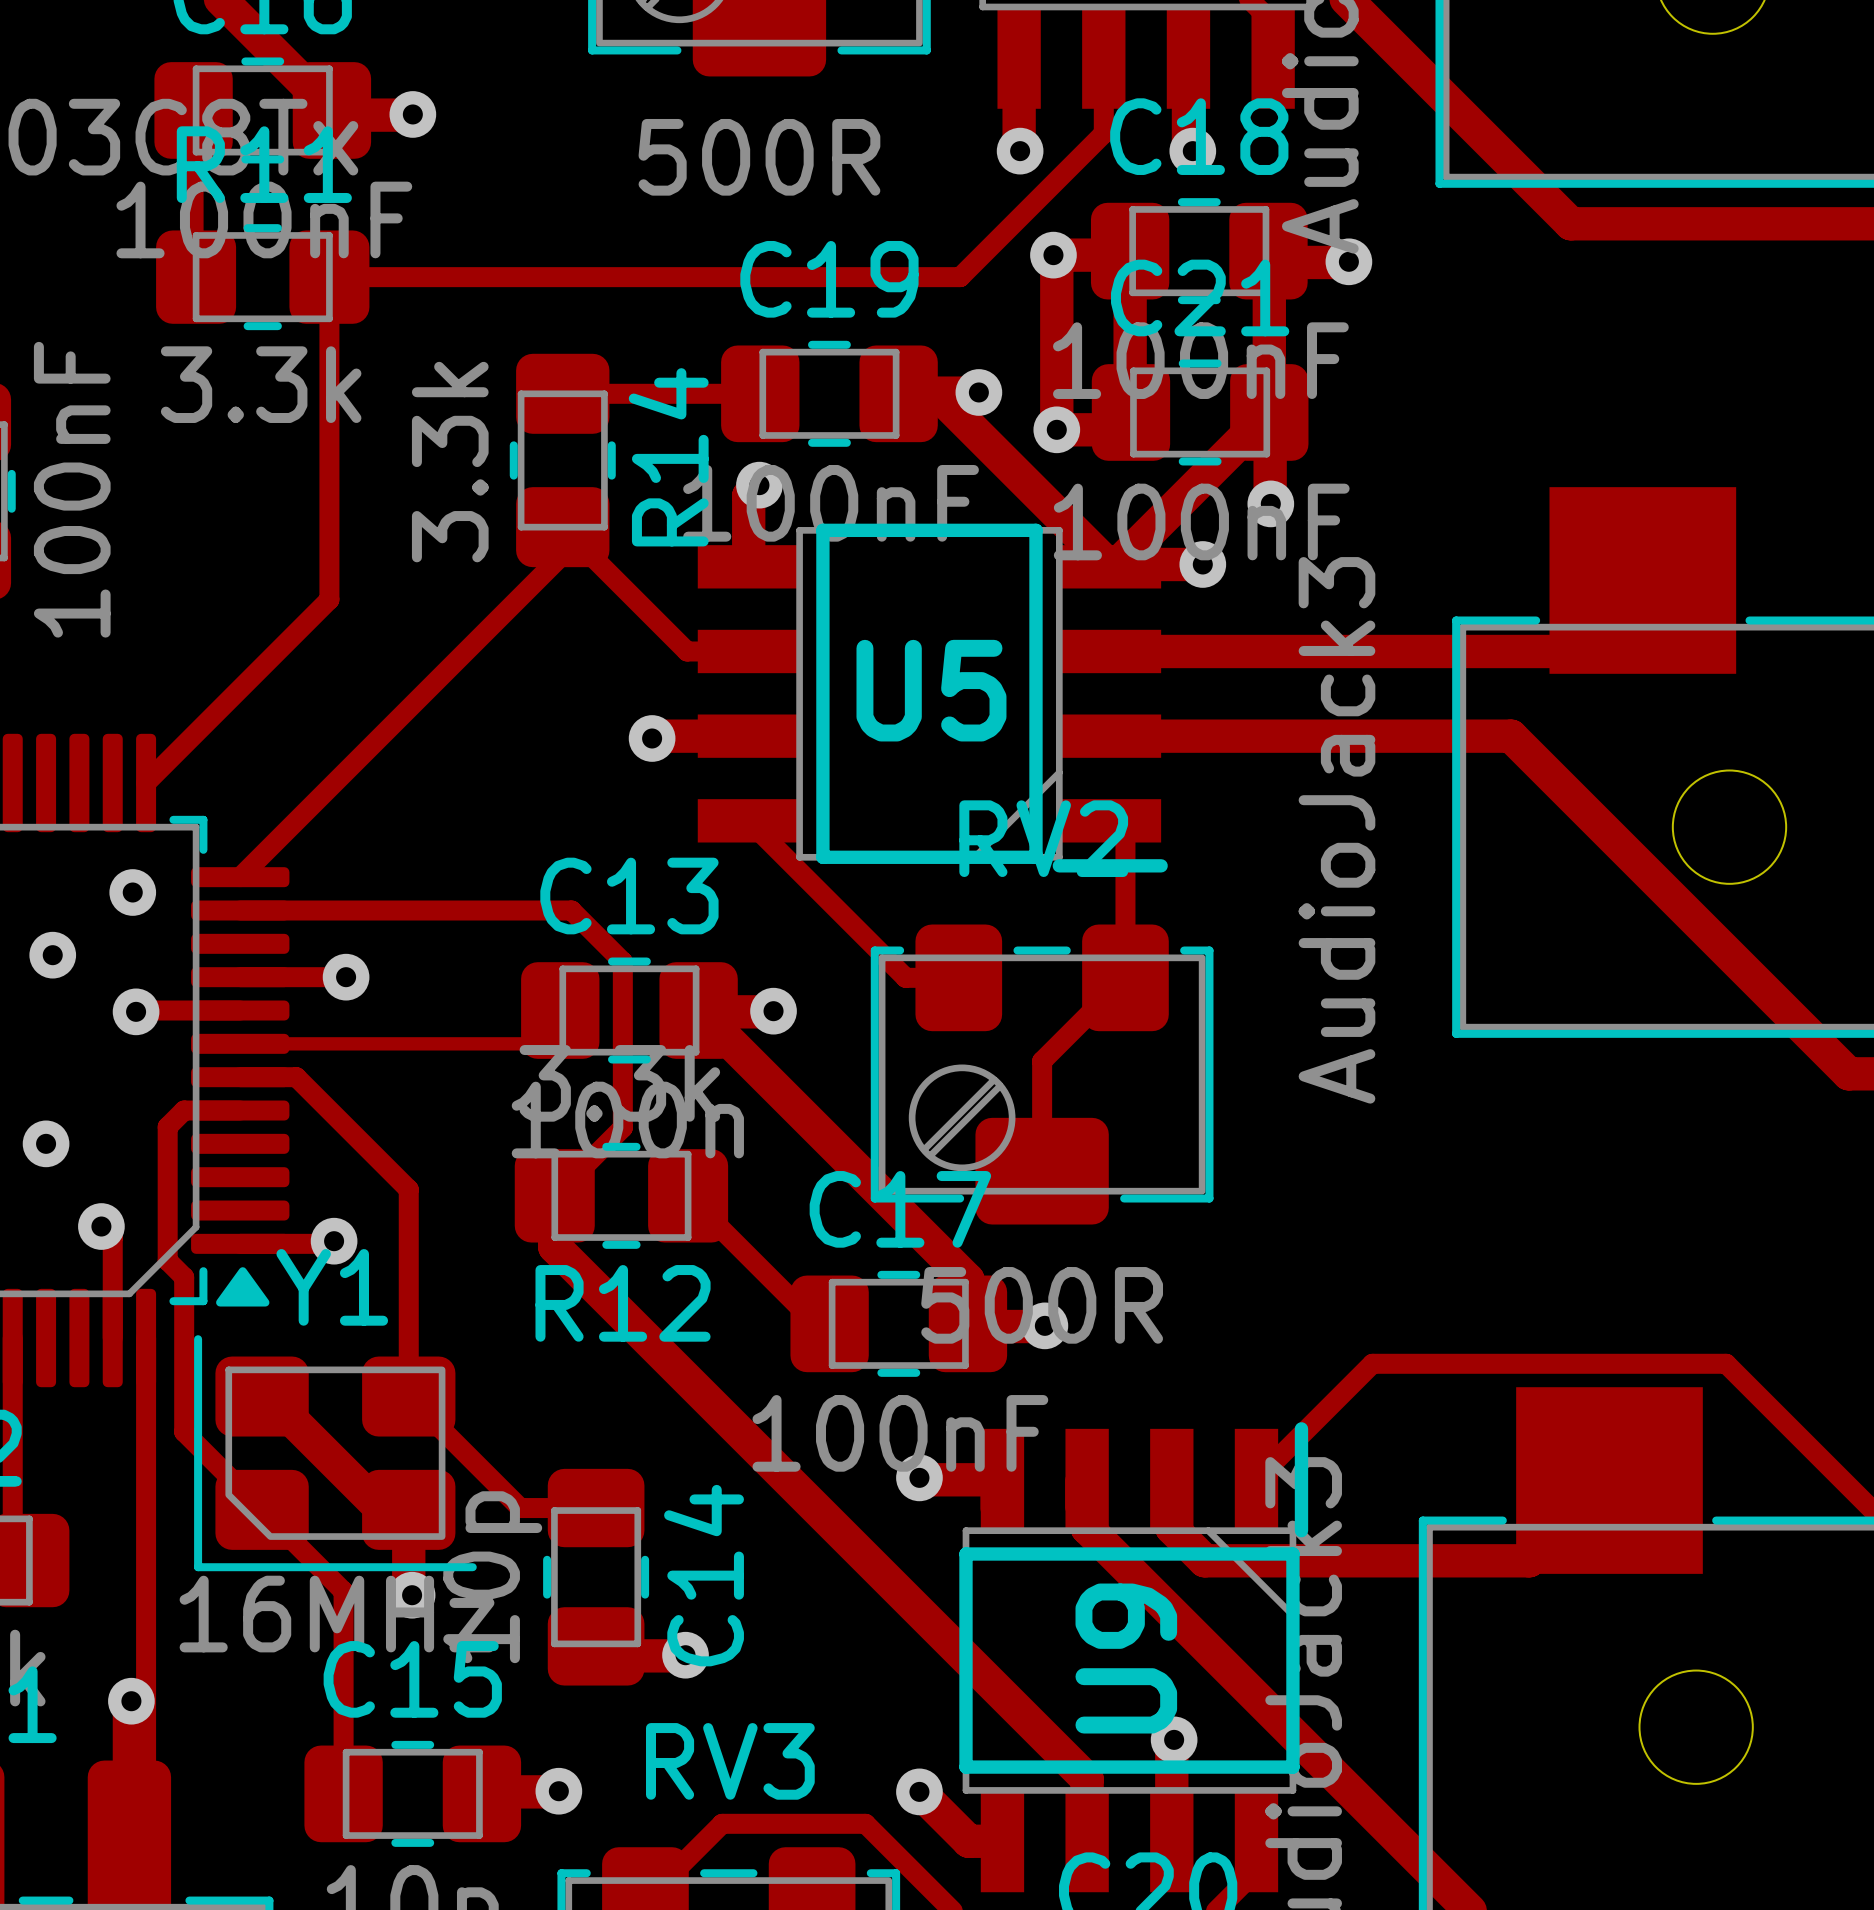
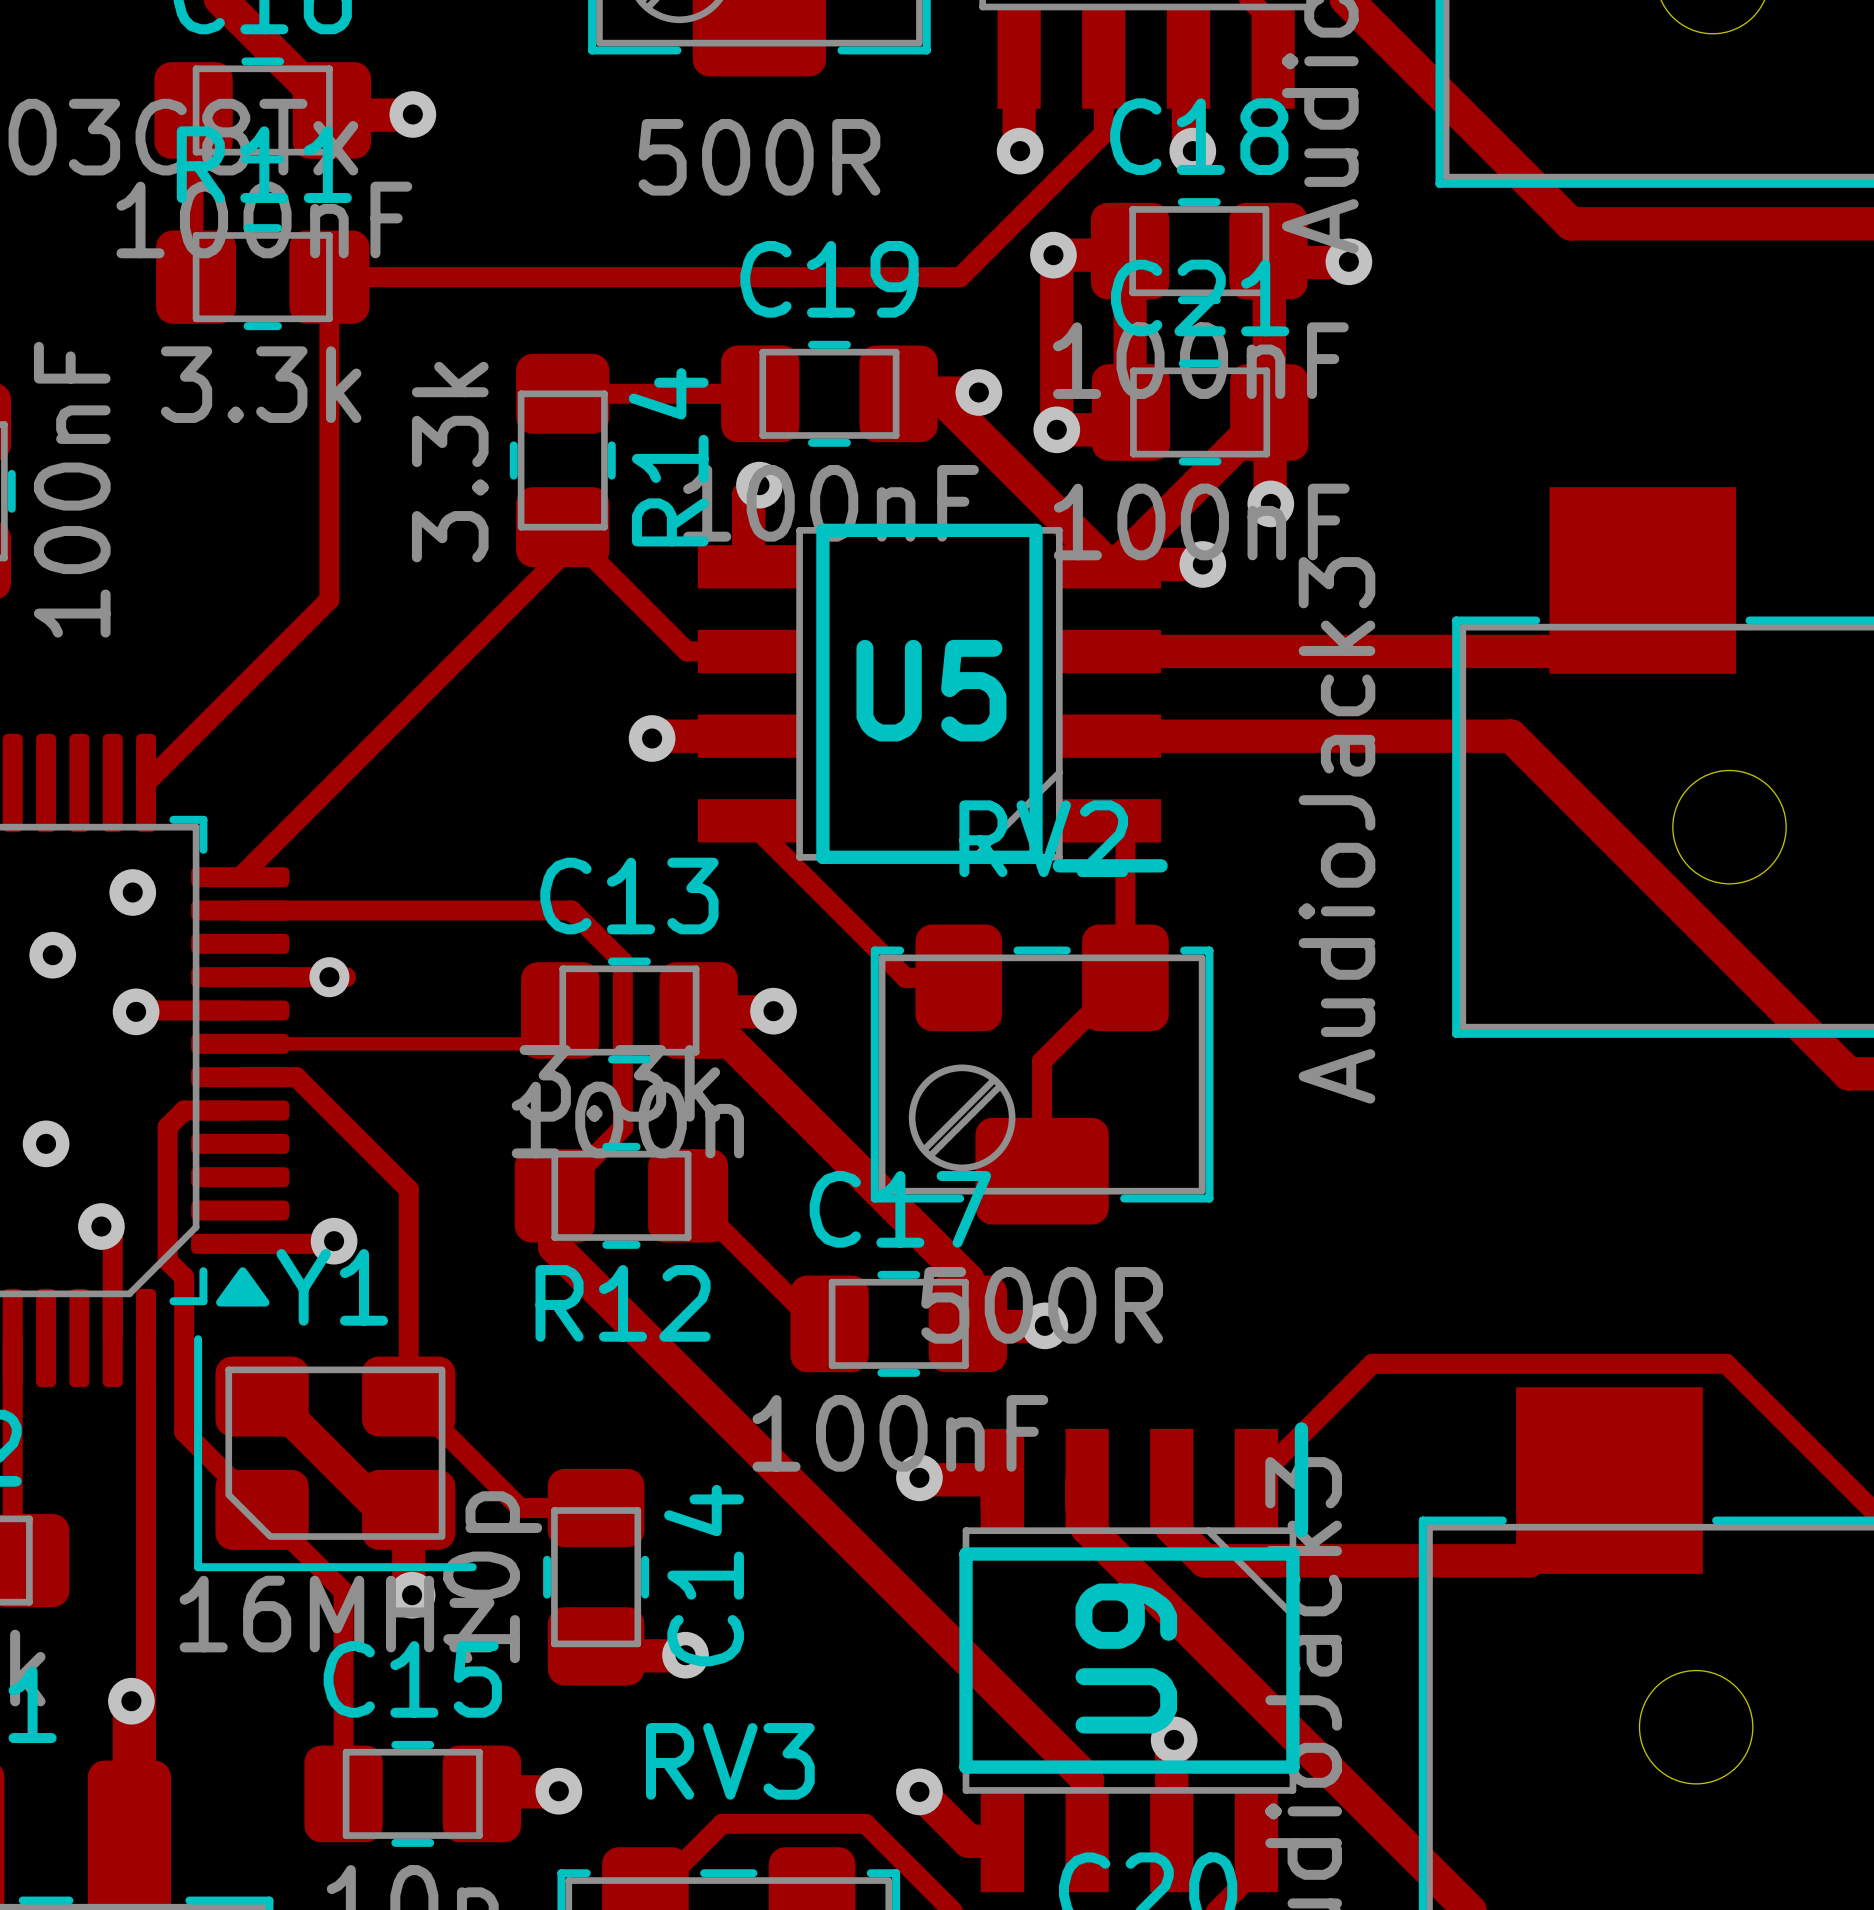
via position: (346, 977) -> (329, 977)

